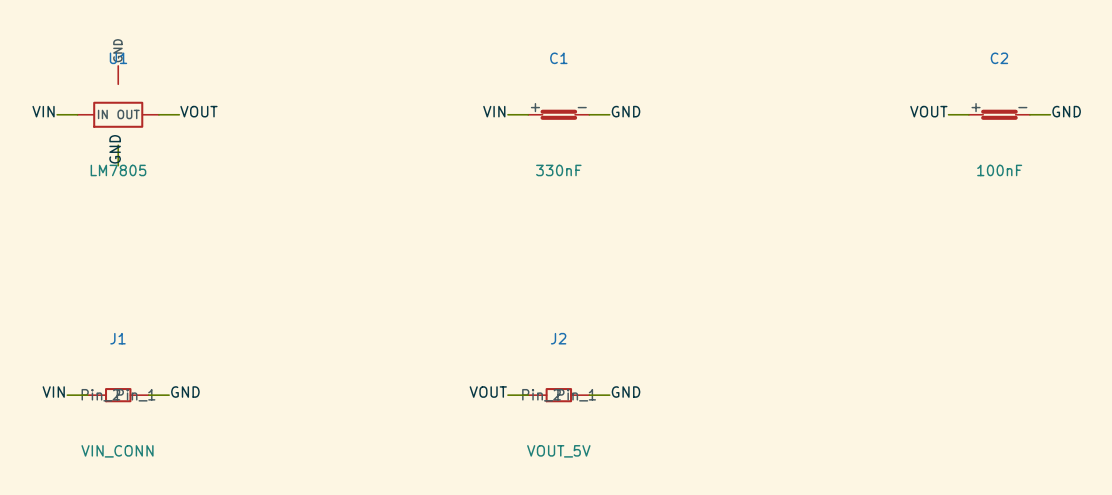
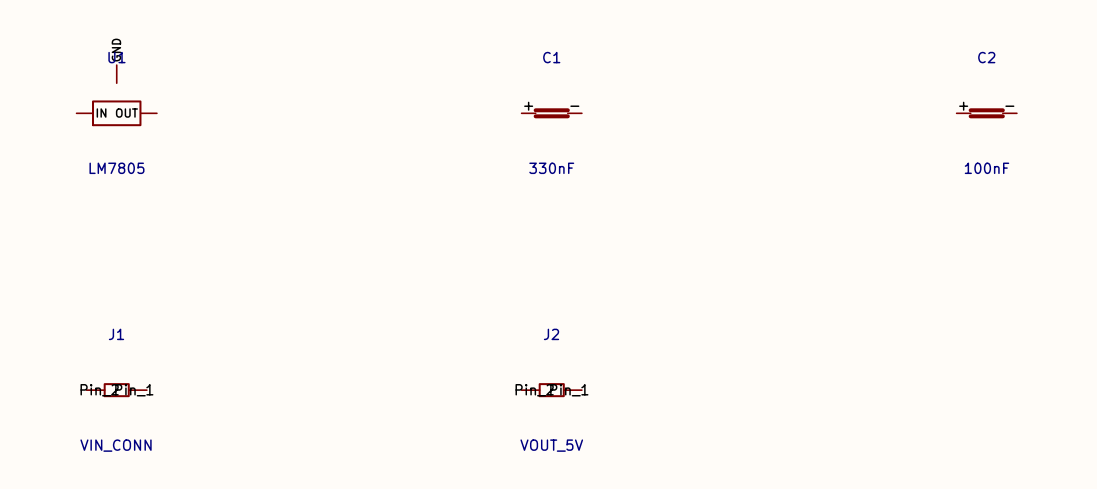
label: VIN (43, 111) -> none
label: VOUT (198, 111) -> none
label: VIN (494, 111) -> none
label: GND (626, 111) -> none
label: VOUT (928, 111) -> none
label: GND (1066, 111) -> none
wire: (57, 114) (77, 114) -> none
wire: (158, 114) (179, 114) -> none
wire: (507, 114) (528, 114) -> none
wire: (589, 114) (609, 114) -> none
wire: (948, 114) (968, 114) -> none
wire: (1029, 114) (1050, 114) -> none
wire: (118, 145) (118, 165) -> none
label: GND (115, 149) -> none
label: VIN (53, 392) -> none
label: GND (185, 392) -> none
label: VOUT (488, 392) -> none
label: GND (626, 392) -> none
wire: (67, 395) (87, 395) -> none
wire: (148, 395) (169, 395) -> none
wire: (507, 395) (528, 395) -> none
wire: (589, 395) (609, 395) -> none

